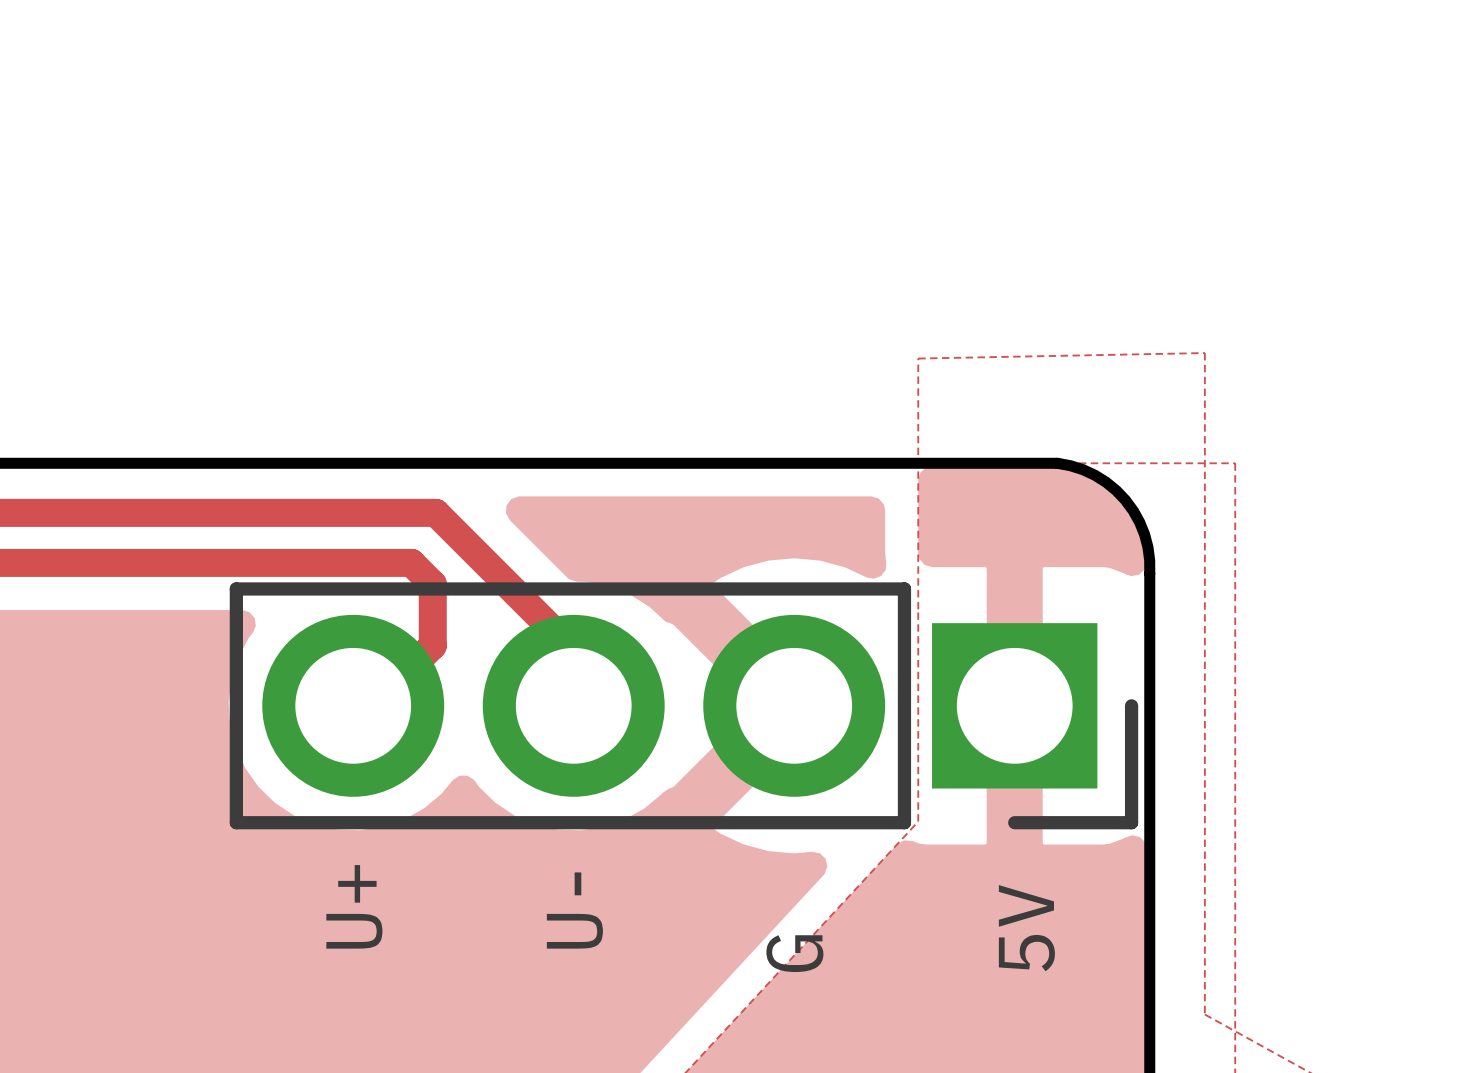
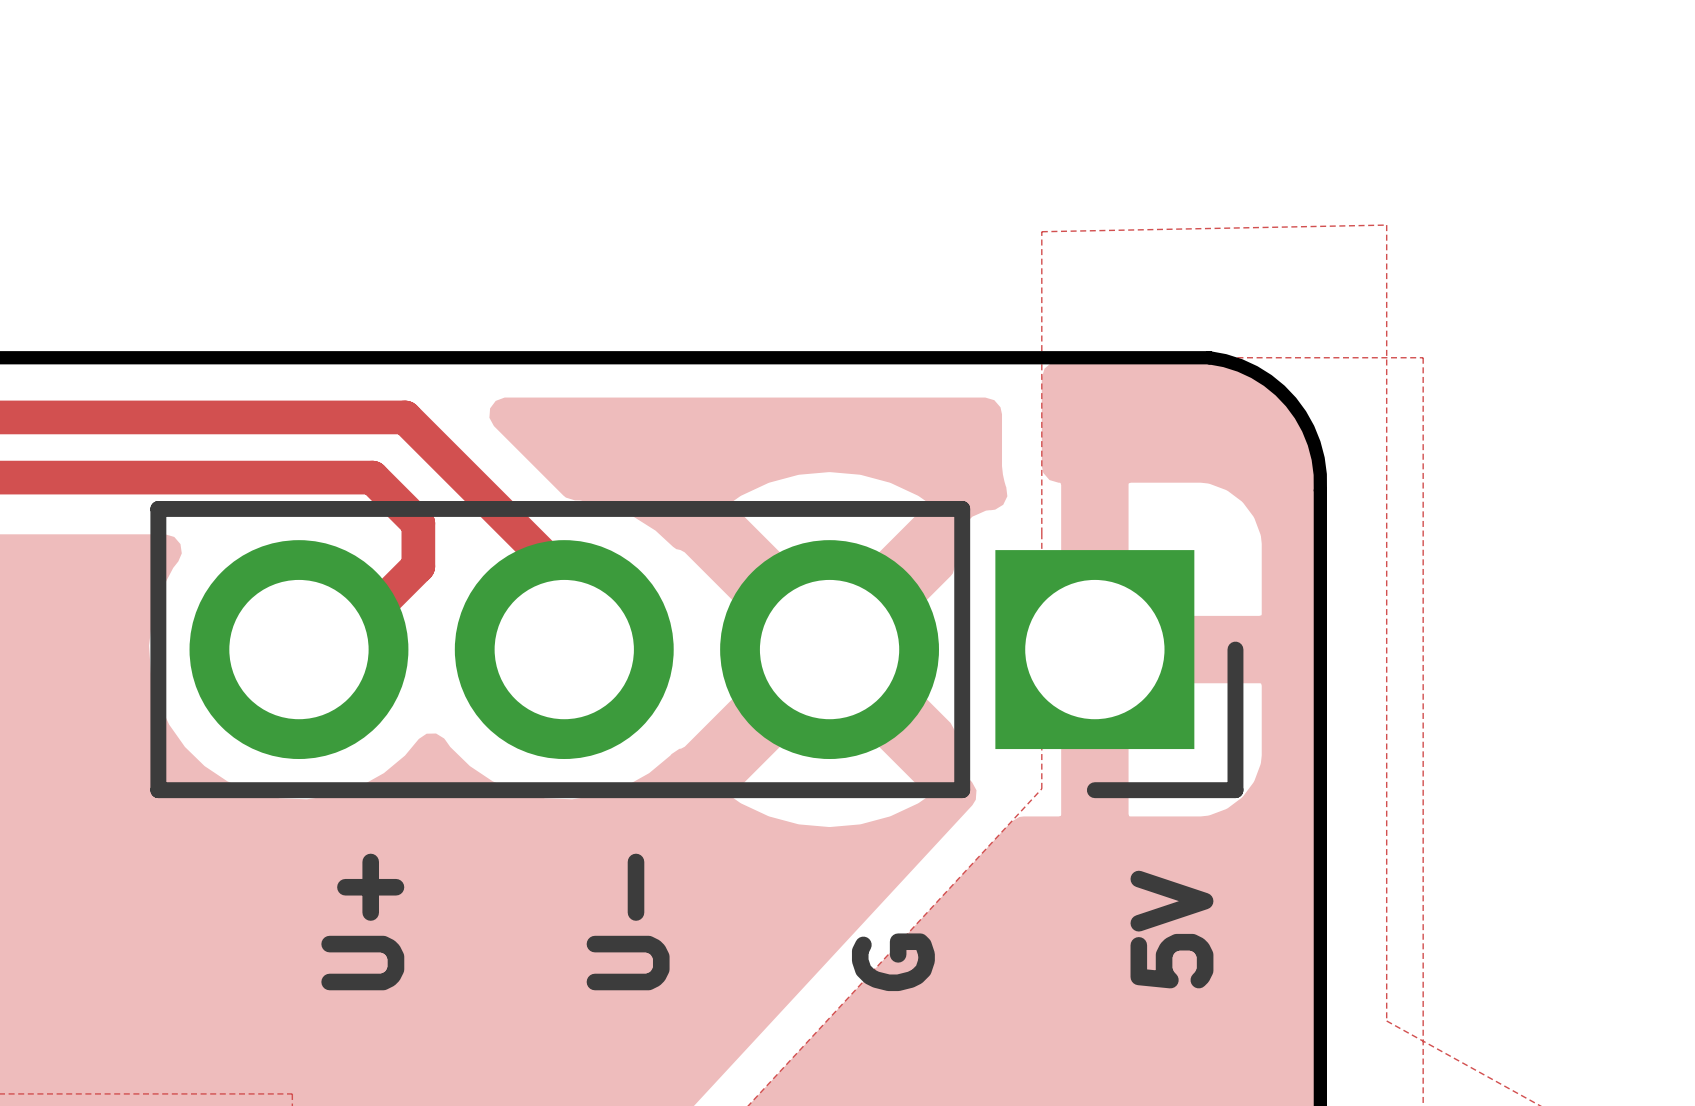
track: (389, 512) (435, 512) (574, 651) (574, 698) -> (405, 417) (628, 640)
track: (361, 562) (411, 562) (432, 584) (432, 645) (372, 705) (354, 705) -> (372, 477) (418, 523) (418, 566) (362, 621) (362, 649)
part position: (683, 705) -> (696, 649)

